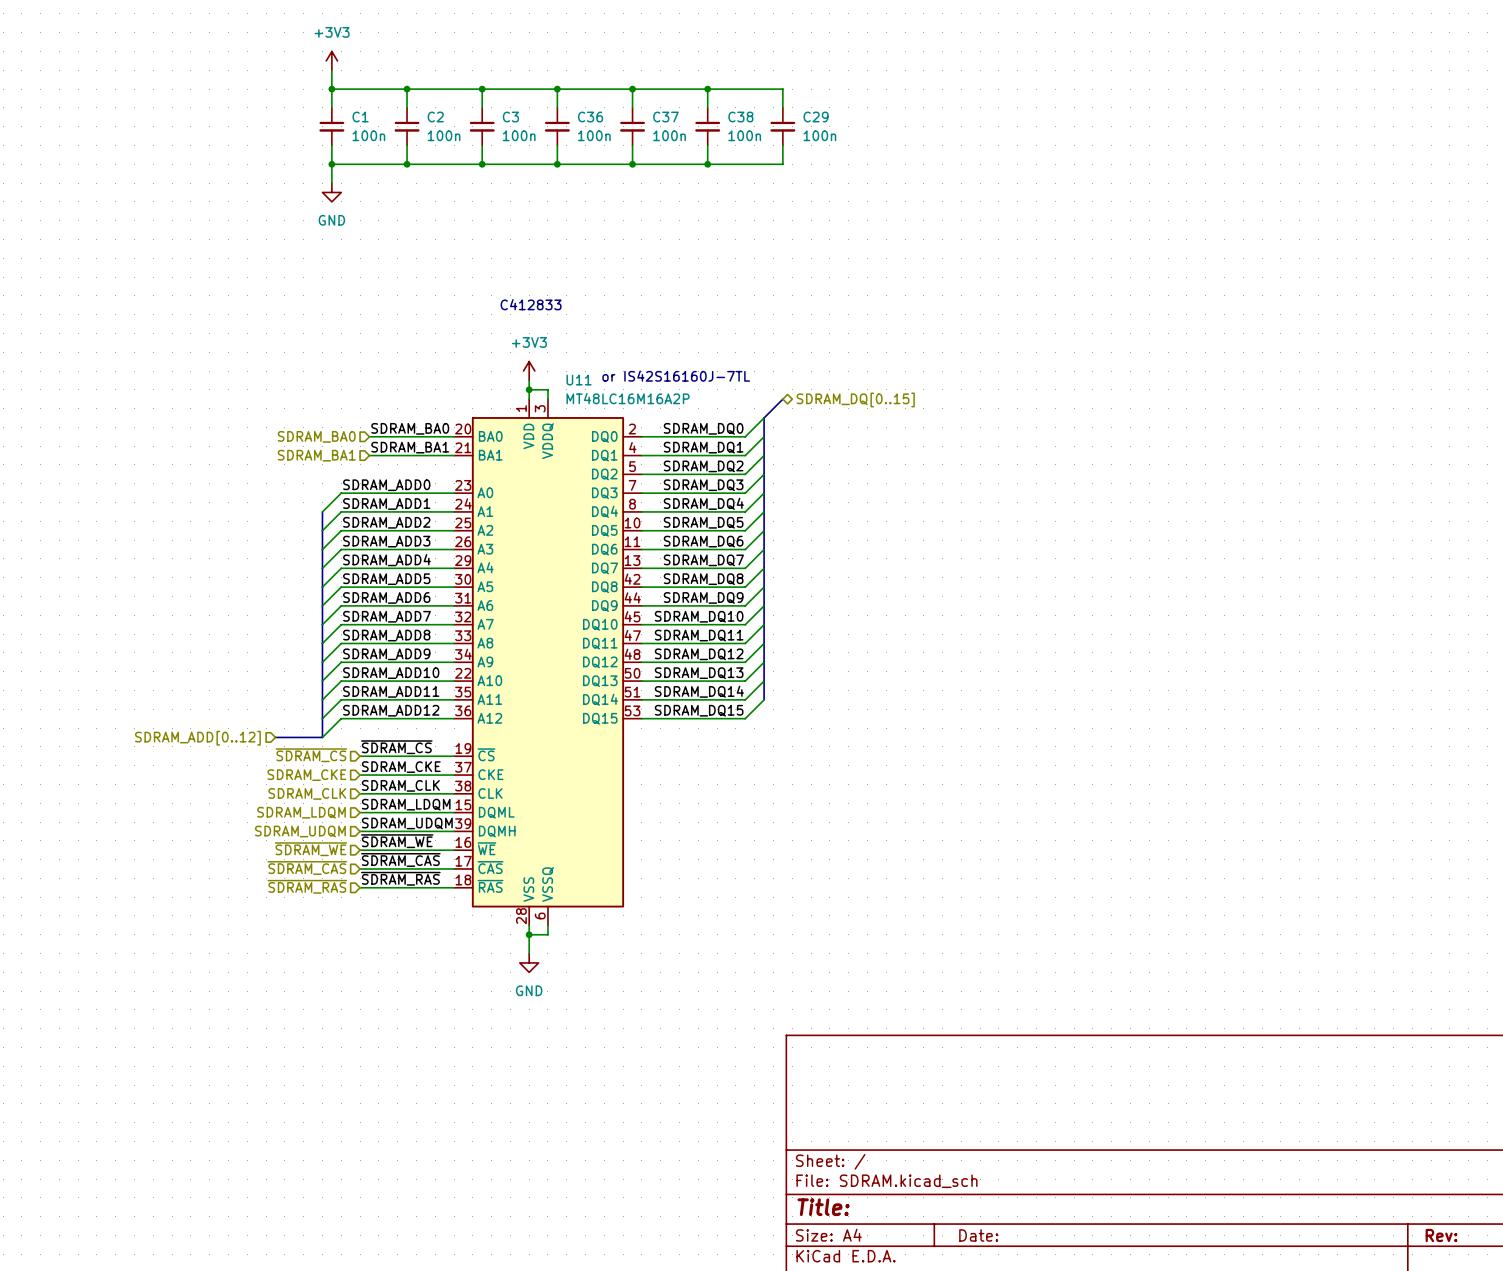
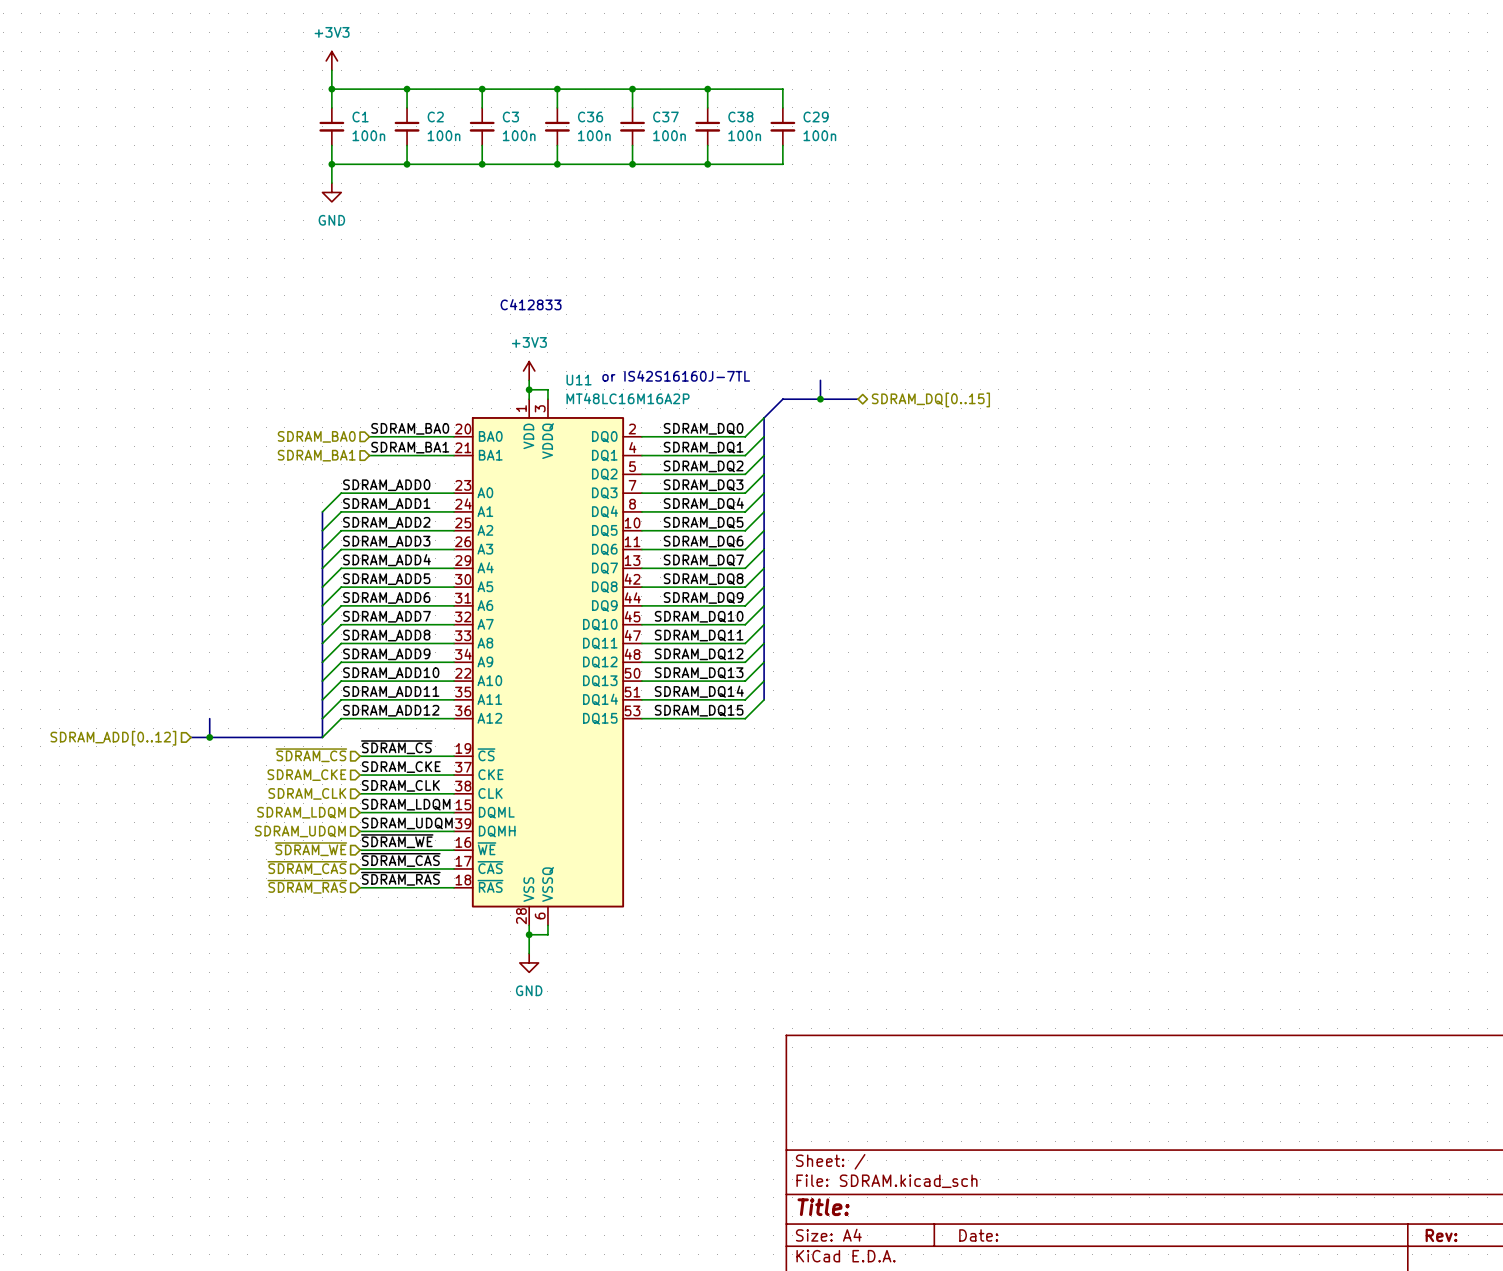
bus: none -> (820, 380) (820, 399)
bus: none -> (782, 399) (858, 399)
junction: none -> (820, 399)
hierarchical label position: SDRAM_DQ[0..15] (855, 399) -> SDRAM_DQ[0..15] (930, 399)
bus: none -> (209, 718) (209, 737)
bus: none -> (190, 737) (275, 737)
junction: none -> (209, 737)
hierarchical label position: SDRAM_ADD[0..12] (197, 738) -> SDRAM_ADD[0..12] (113, 738)

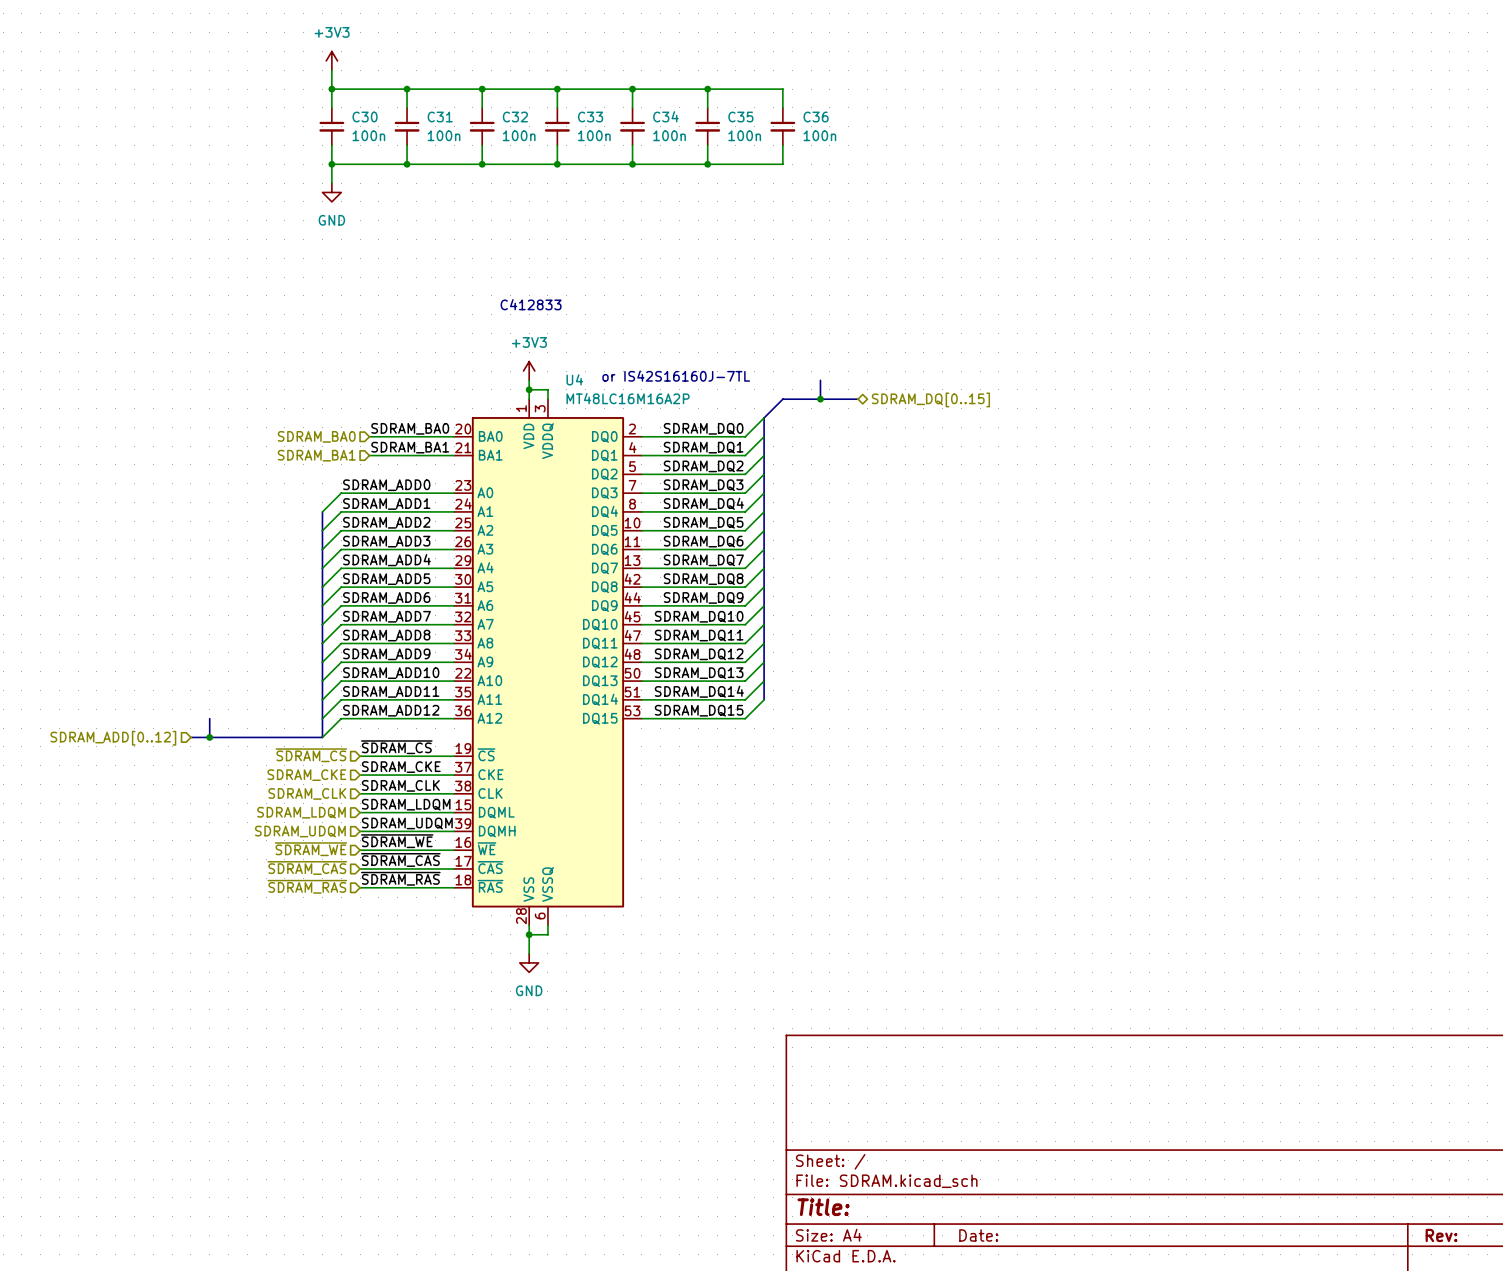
C1 name: C1 (360, 117) -> C30 (365, 117)
C2 name: C2 (435, 117) -> C31 (440, 117)
C3 name: C3 (510, 117) -> C32 (515, 117)
C36 name: C36 (590, 117) -> C33 (590, 117)
C37 name: C37 (665, 117) -> C34 (665, 116)
C38 name: C38 (740, 117) -> C35 (740, 117)
C29 name: C29 (816, 117) -> C36 (816, 117)
U11 name: U11 (579, 380) -> U4 (574, 379)

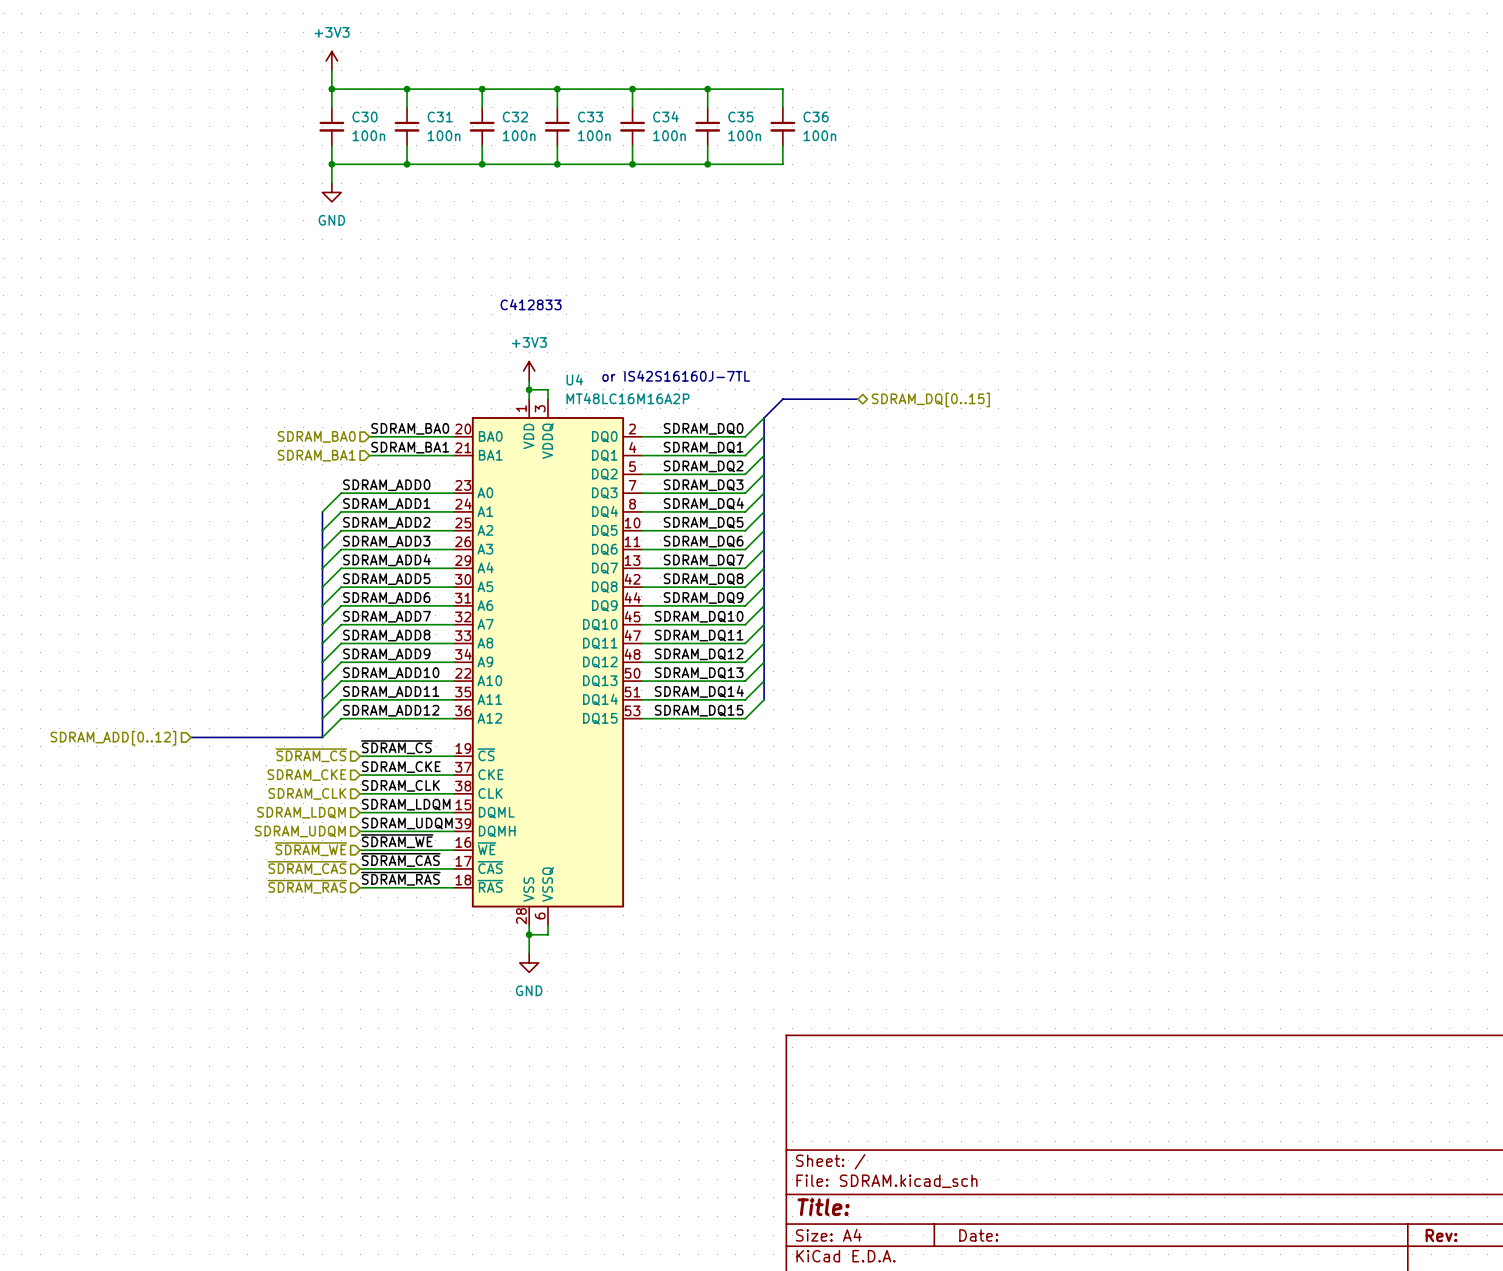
bus: (820, 380) (820, 399) -> none
junction: (820, 399) -> none
bus: (209, 718) (209, 737) -> none
junction: (209, 737) -> none

